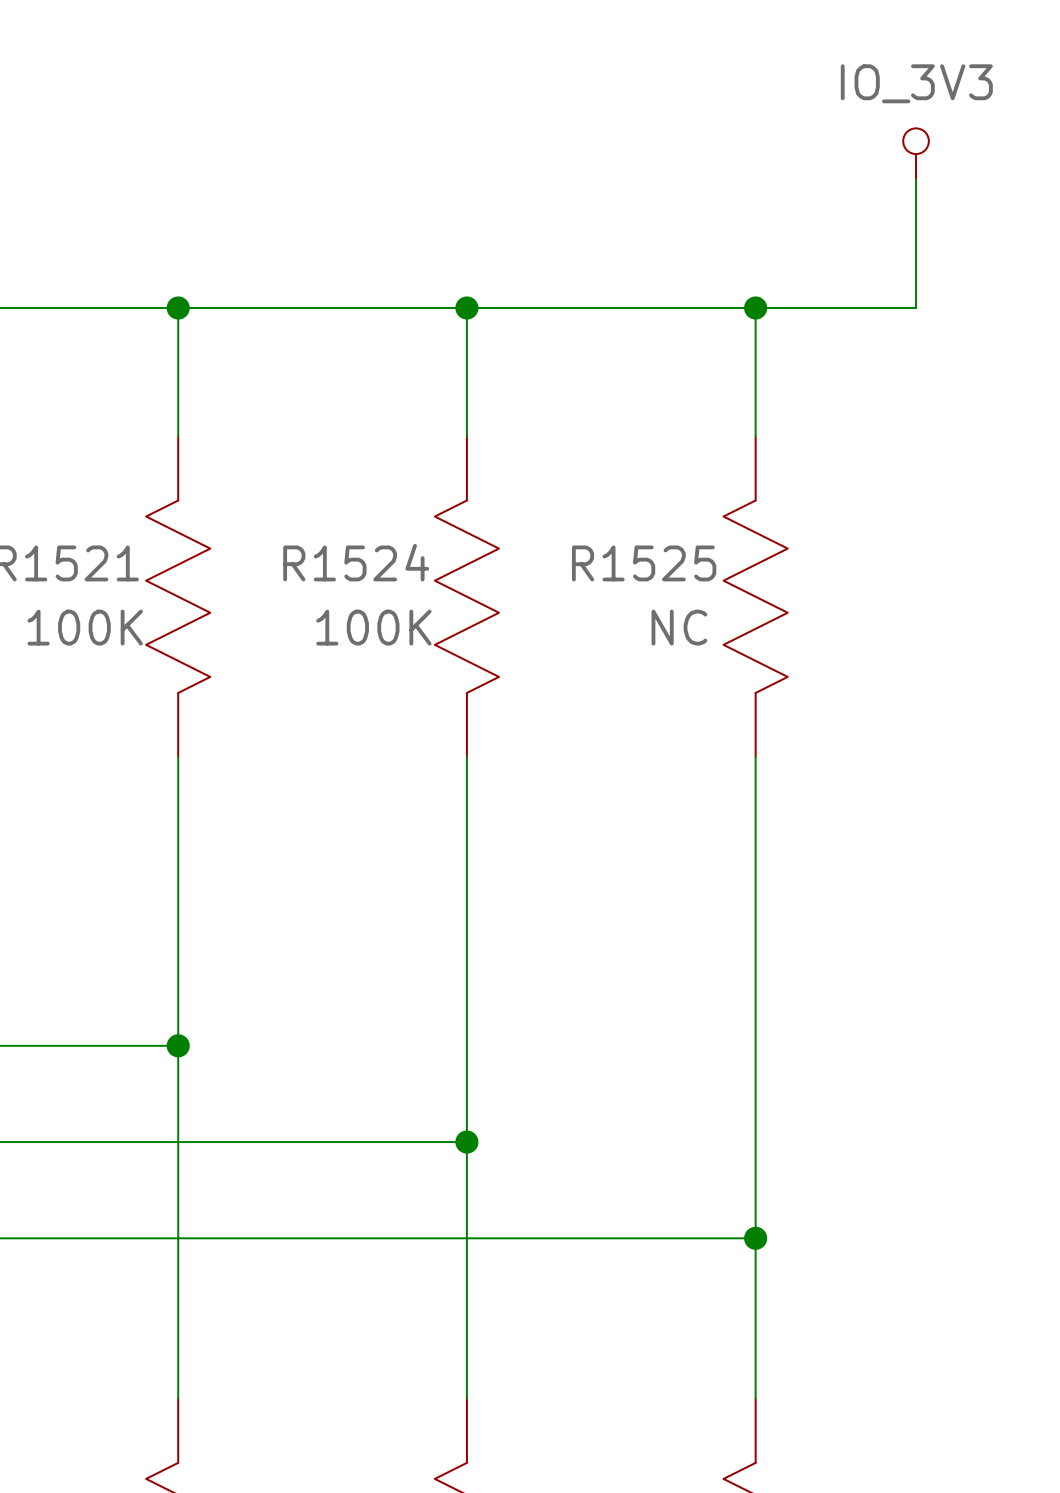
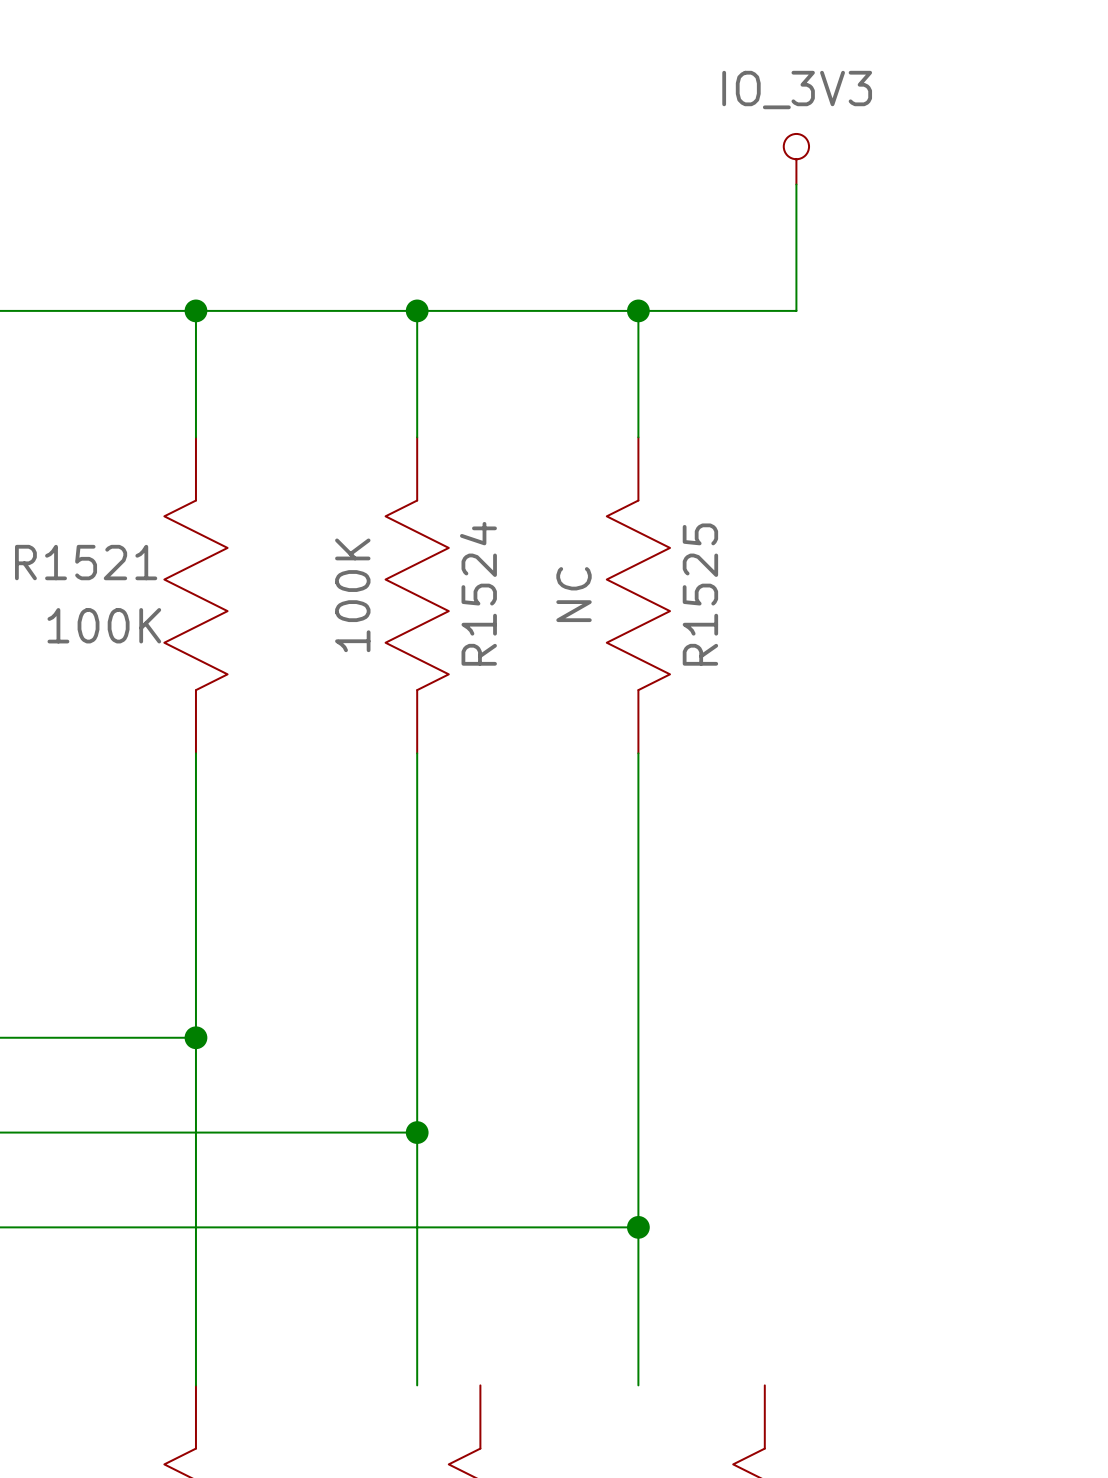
power symbol position: IO_3V3 (916, 154) -> IO_3V3 (796, 159)
wire: (916, 179) (916, 308) (787, 308) -> (796, 184) (796, 310)
wire: (466, 308) (466, 436) -> (417, 310) (417, 437)
junction position: (466, 308) -> (417, 310)
junction: none -> (638, 310)
wire: (755, 308) (755, 436) -> (638, 310) (638, 437)
junction: (755, 308) -> none
R1524 name rotation: 0° (356, 562) -> 90° counterclockwise (478, 593)
R1525 name rotation: 0° (644, 563) -> 90° counterclockwise (700, 594)
R1524 position: (466, 596) -> (417, 595)
R1525 position: (755, 596) -> (638, 595)
R1524 value rotation: 0° (373, 627) -> 90° counterclockwise (352, 595)
R1525 value rotation: 0° (679, 627) -> 90° counterclockwise (574, 594)
wire: (466, 757) (466, 1398) -> (417, 753) (417, 1385)
wire: (755, 757) (755, 1398) -> (638, 753) (638, 1385)
wire: (402, 1142) (466, 1142) -> none
junction position: (466, 1142) -> (417, 1132)
wire: (627, 1238) (755, 1238) -> none
junction: none -> (638, 1227)
junction: (755, 1238) -> none

